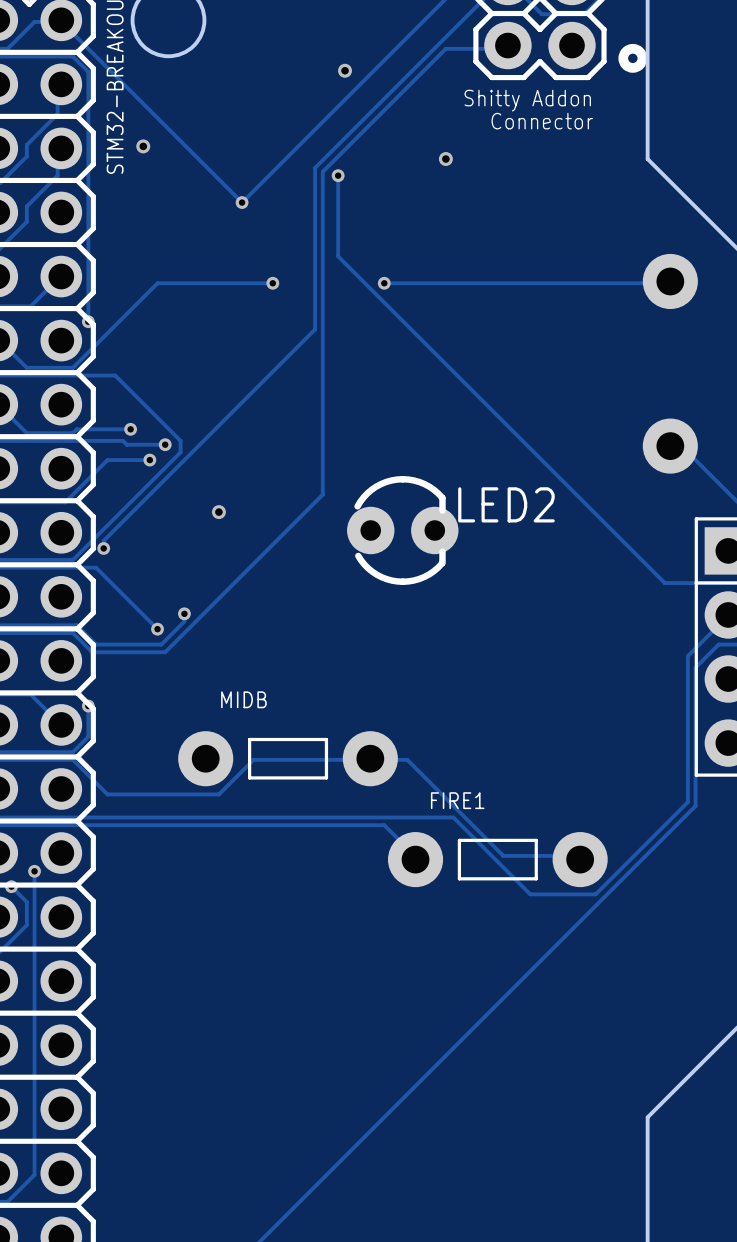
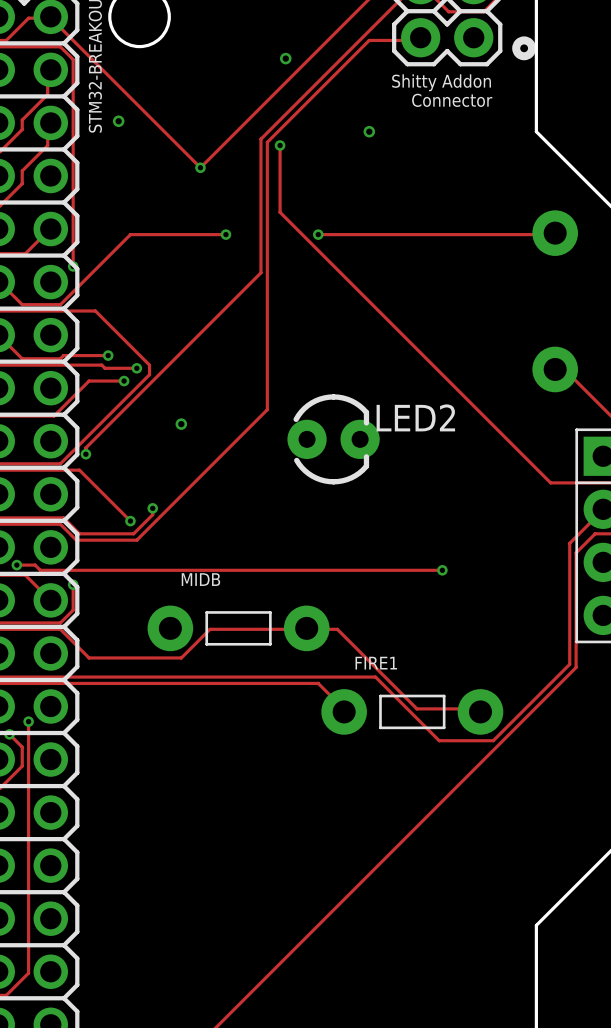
track: none -> (16, 565) (35, 565) (40, 570) (442, 570)
via: none -> (16, 565)
via: none -> (442, 570)

